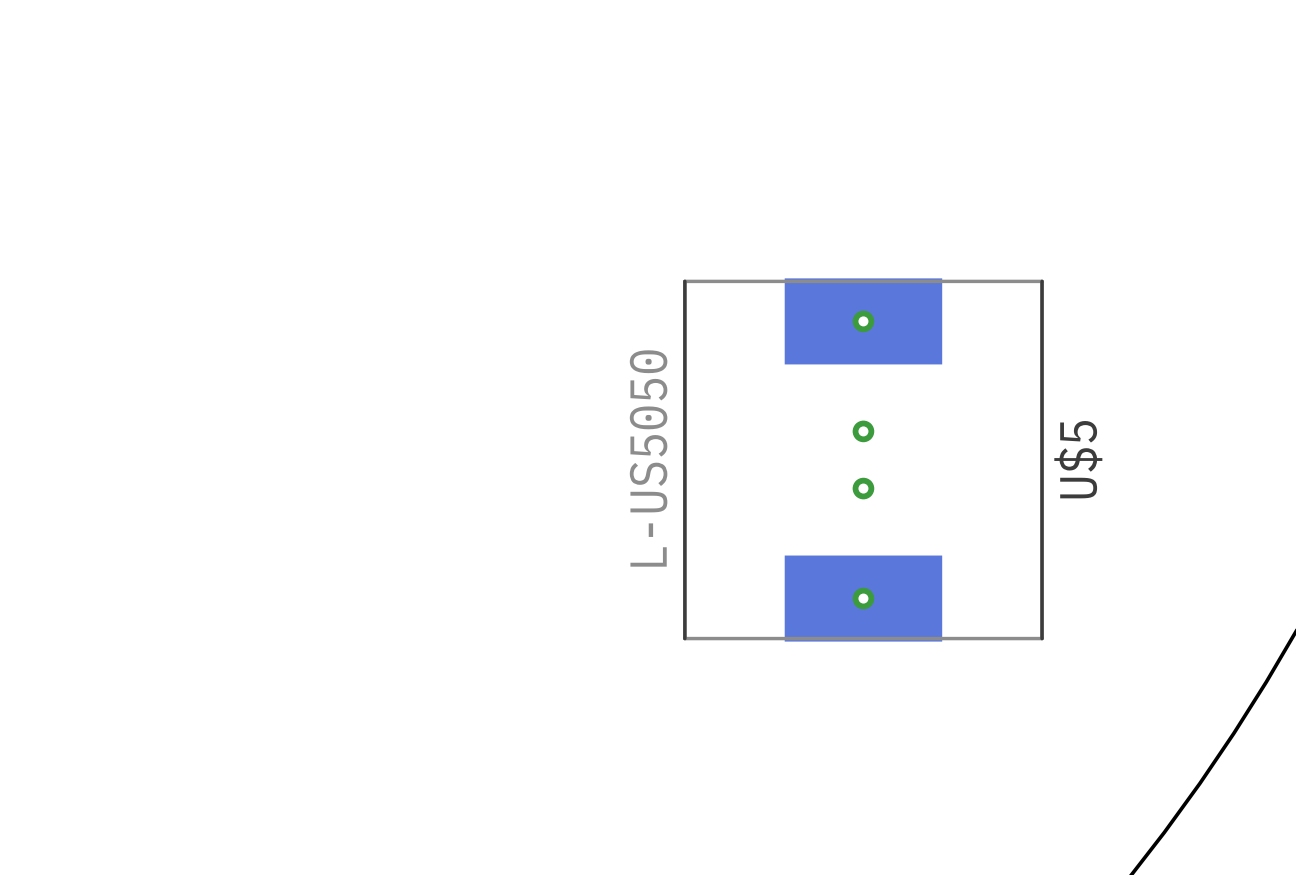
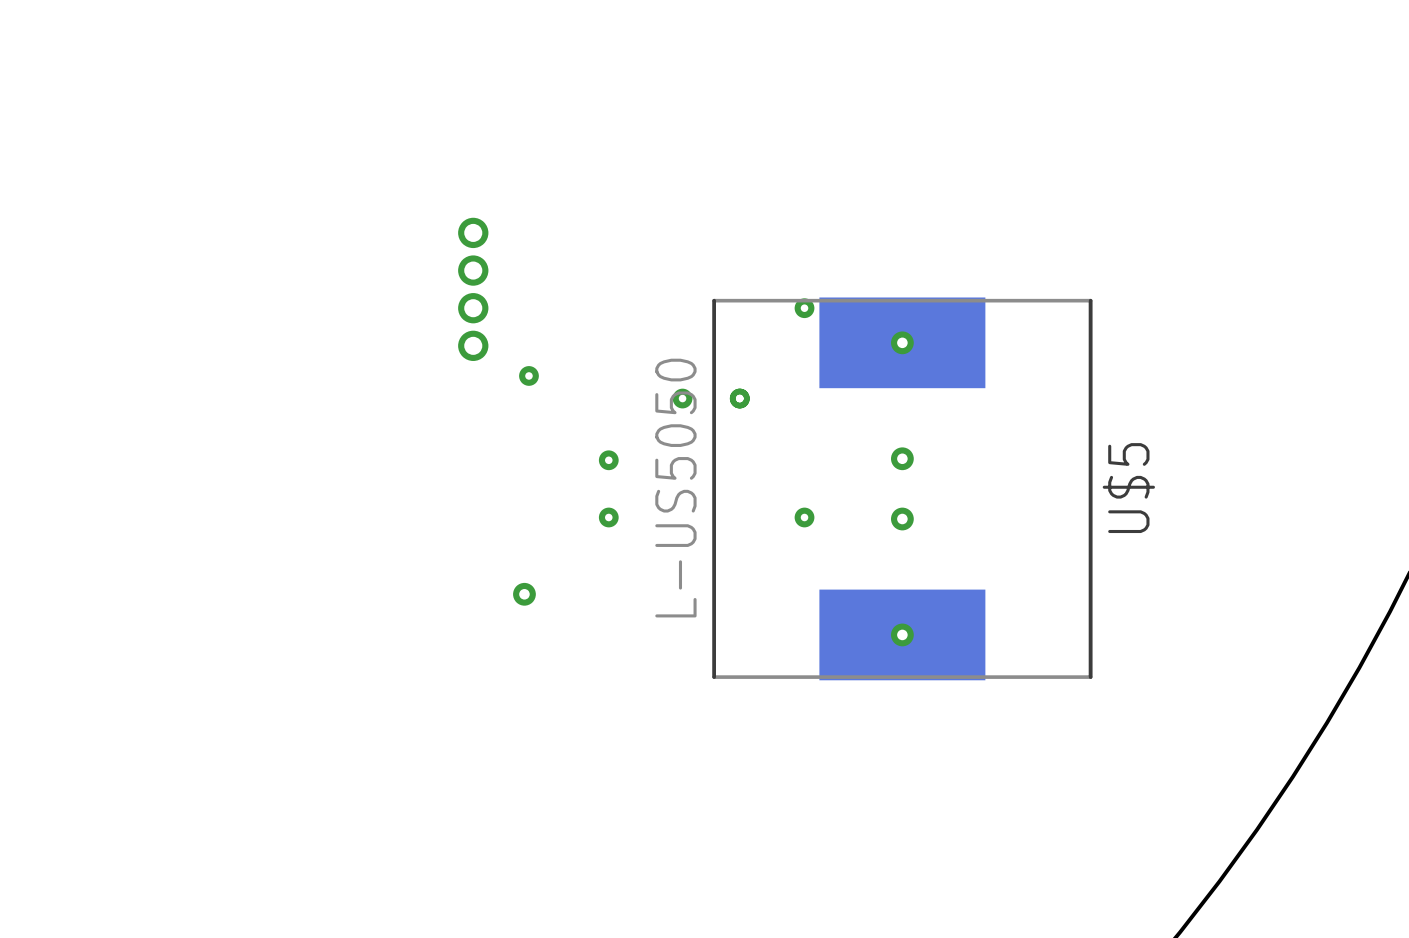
via: none -> (473, 232)
via: none -> (473, 270)
via: none -> (473, 308)
via: none -> (804, 308)
via: none -> (473, 345)
via: none -> (528, 375)
via: none -> (682, 398)
via: none -> (739, 398)
via: none -> (608, 460)
via: none -> (608, 517)
via: none -> (804, 517)
via: none -> (524, 594)

